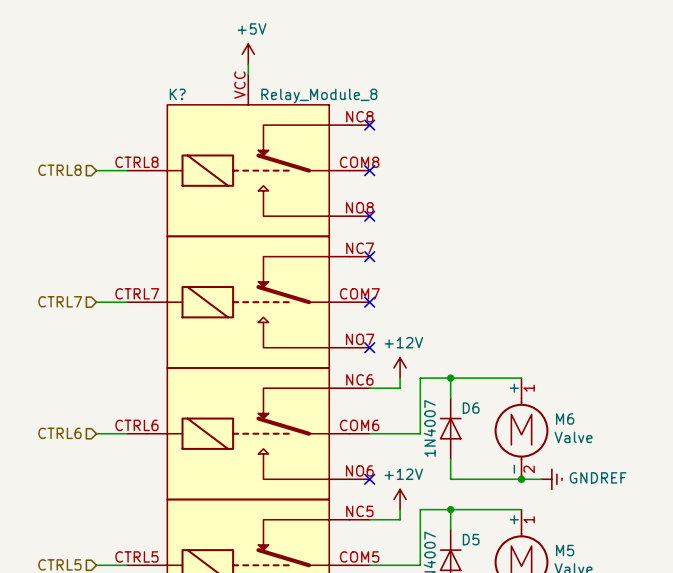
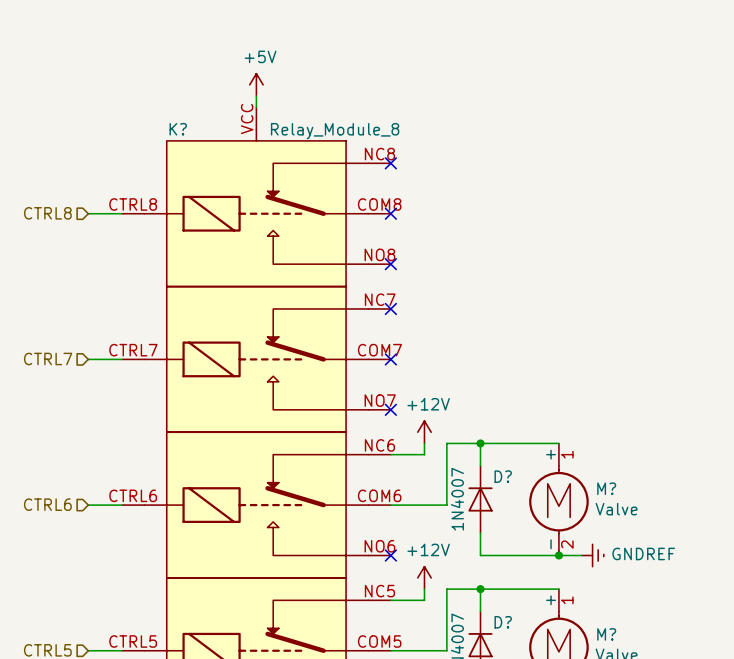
D6 name: D6 (471, 408) -> D? (503, 476)
M6 name: M6 (565, 418) -> M? (606, 488)
D5 name: D5 (471, 539) -> D? (503, 622)
M5 name: M5 (565, 550) -> M? (606, 634)

